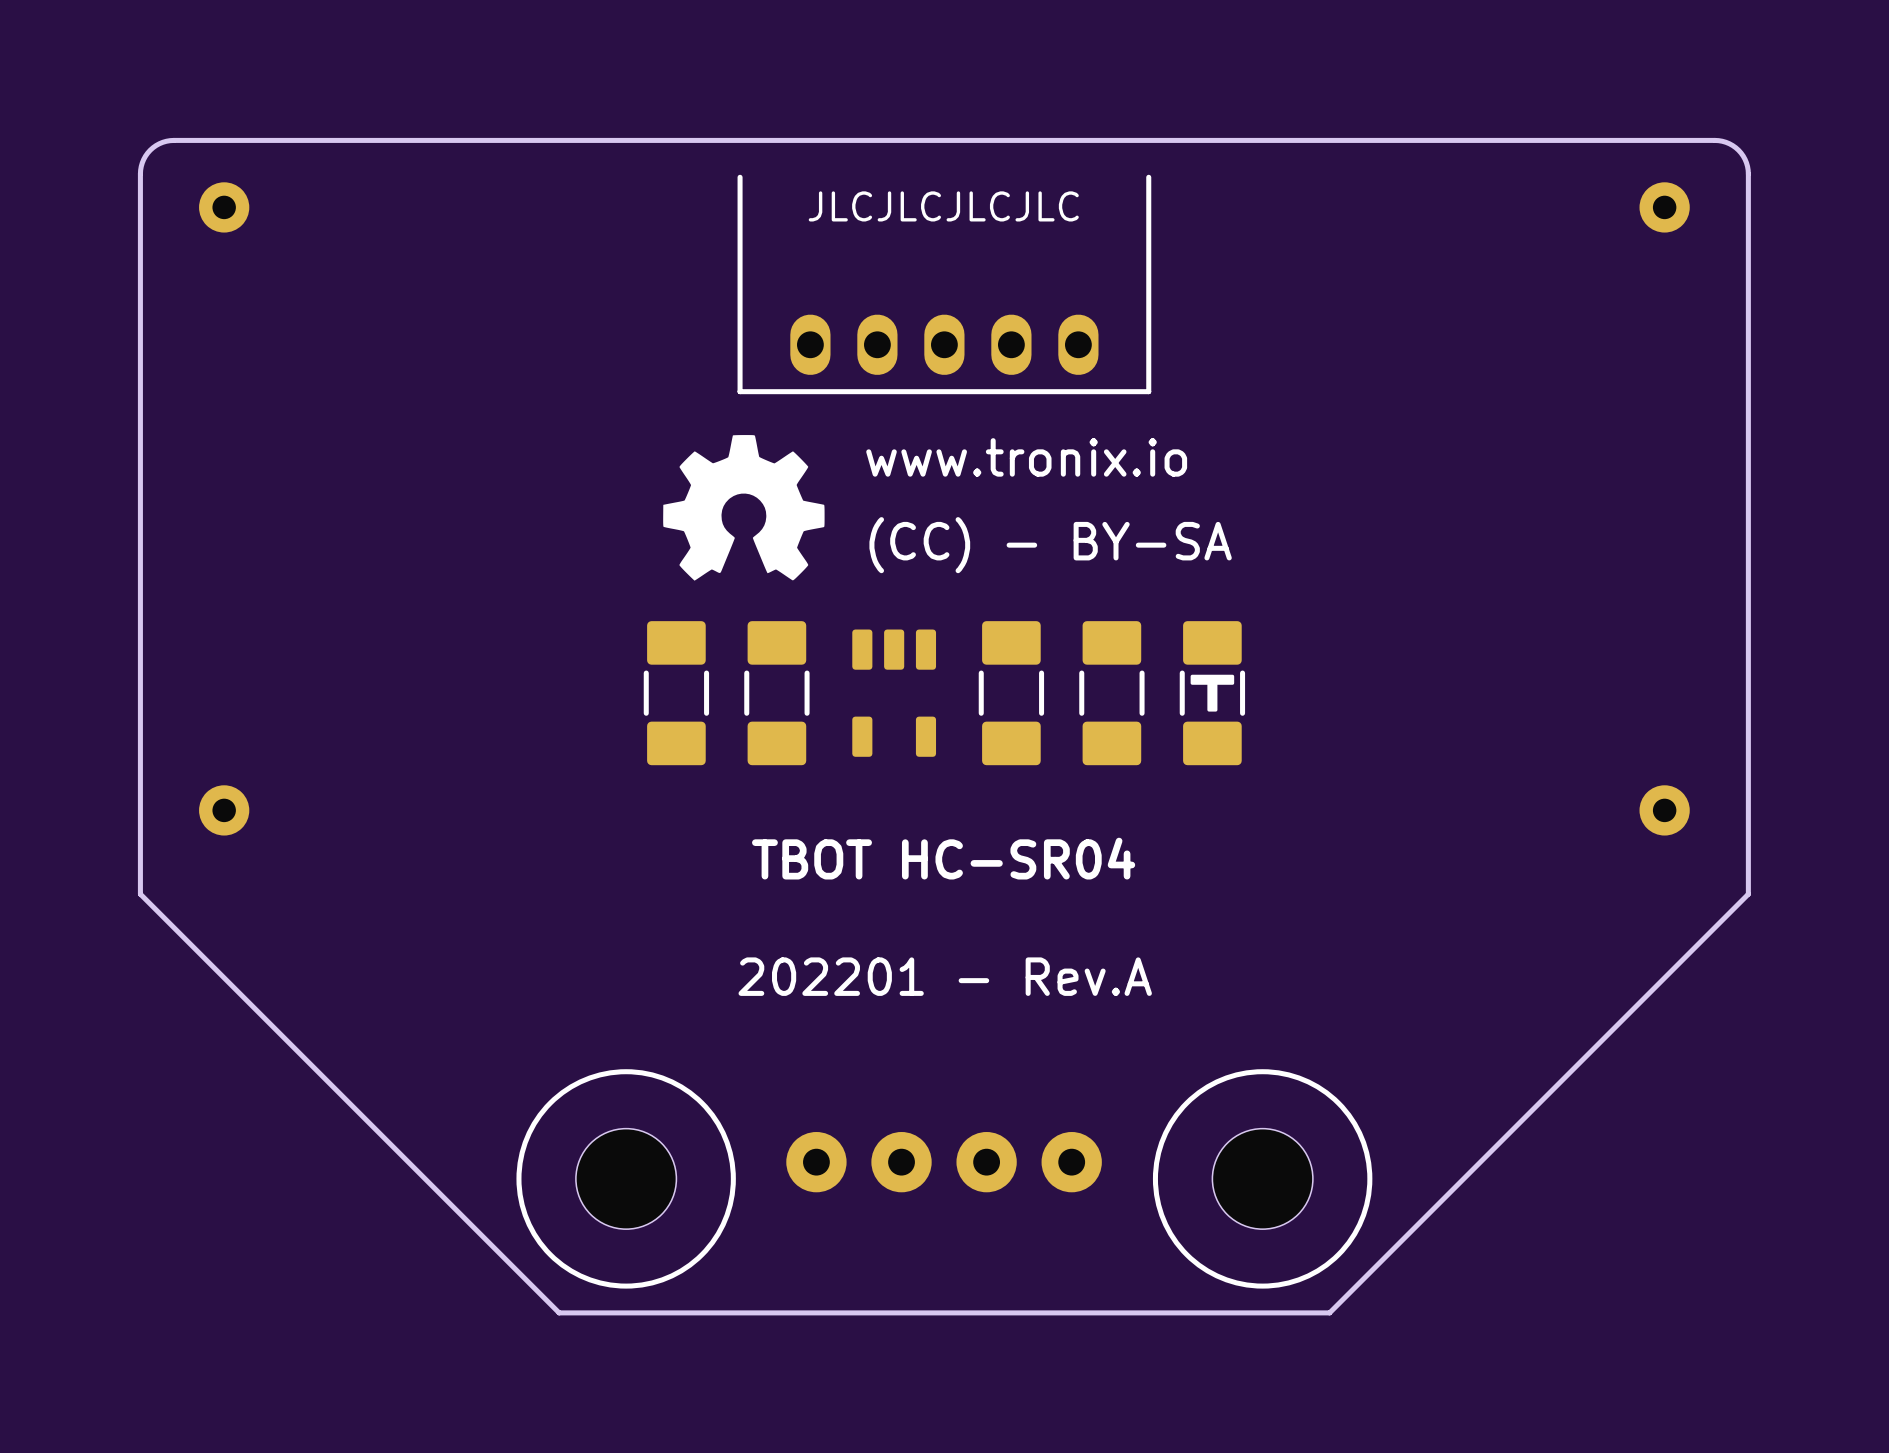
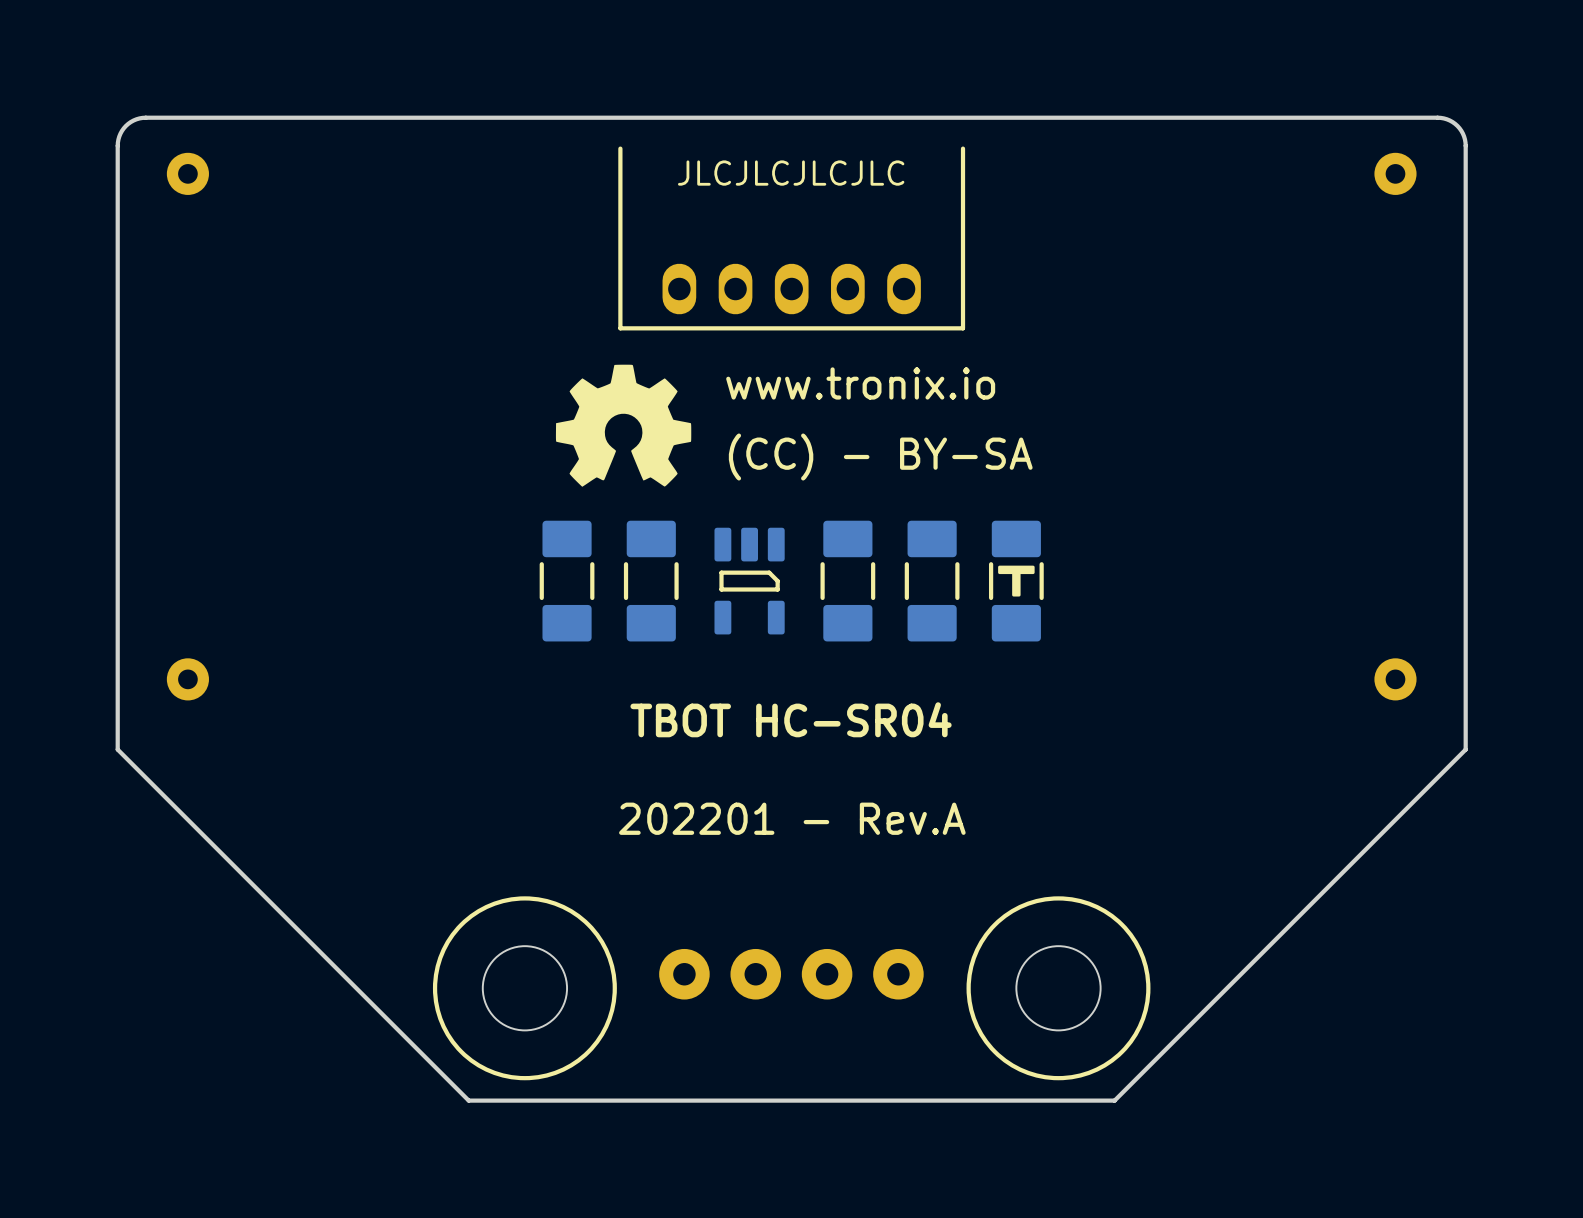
part footprint: [852, 629, 937, 757] -> [714, 527, 785, 635]

